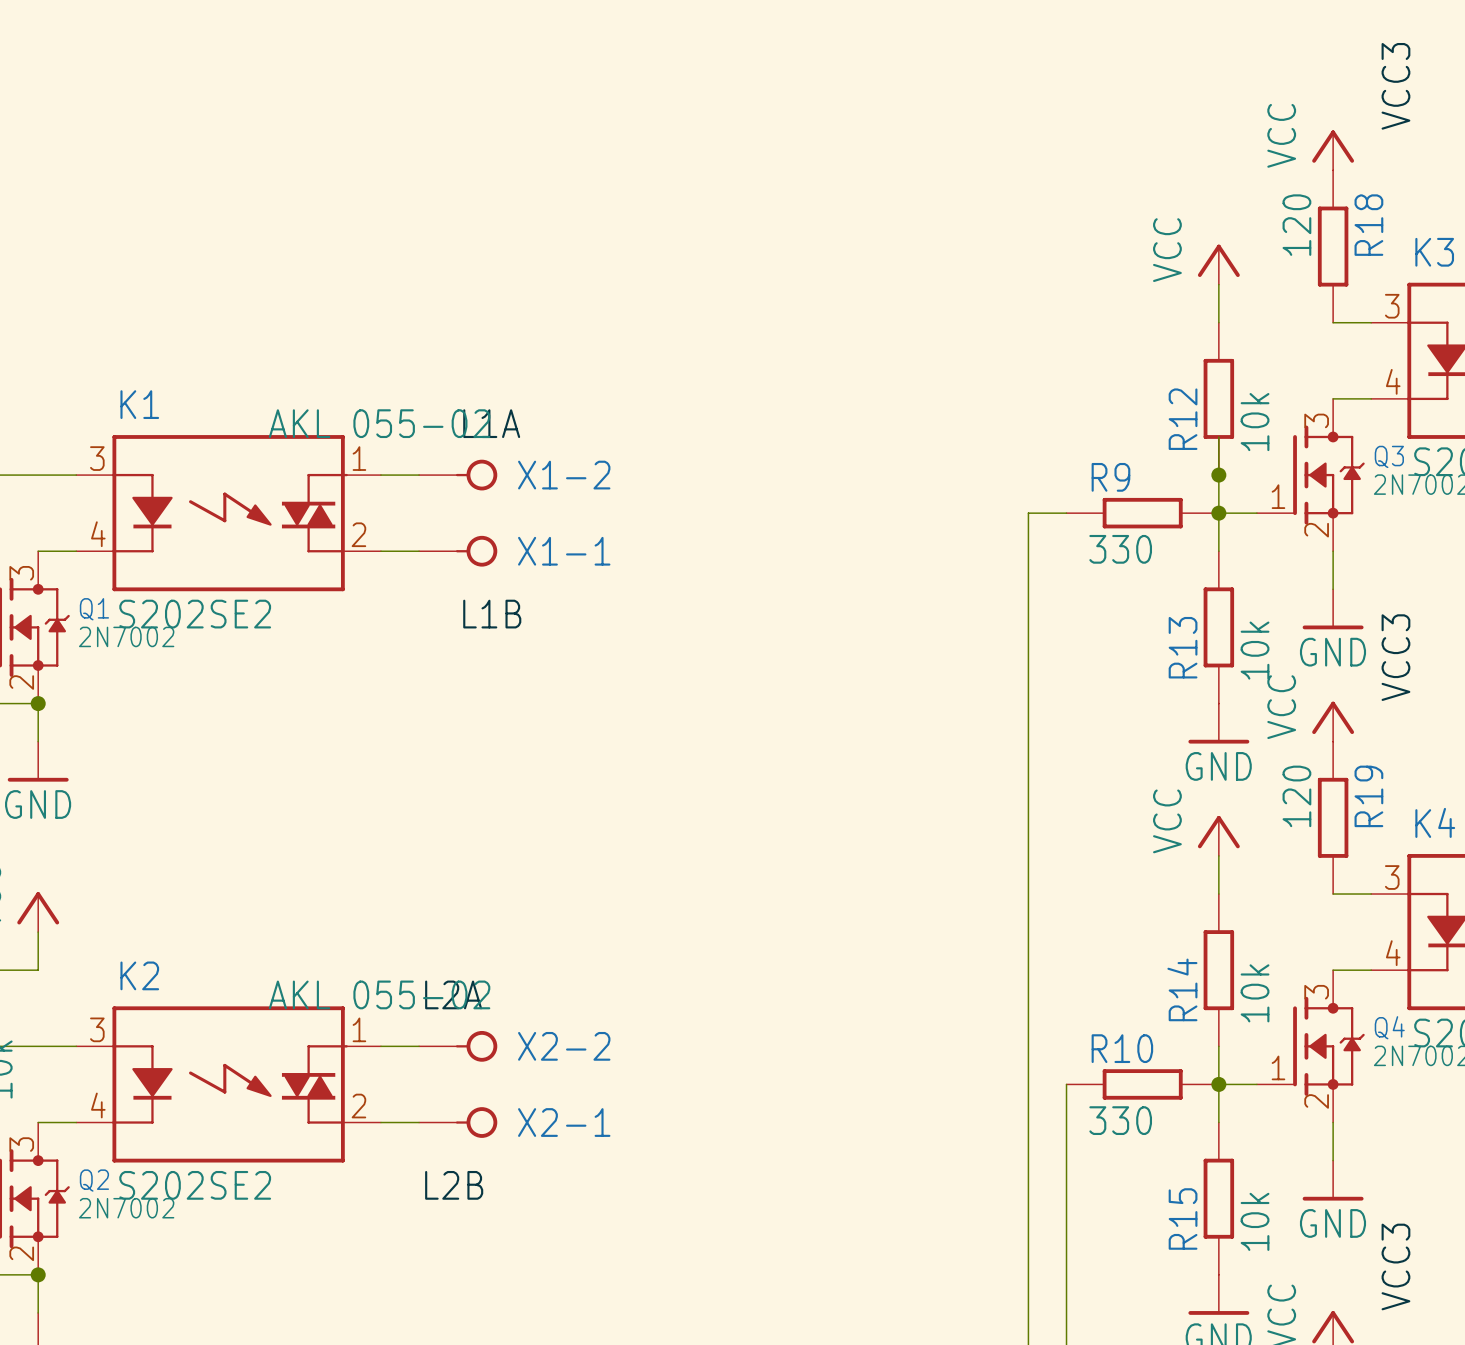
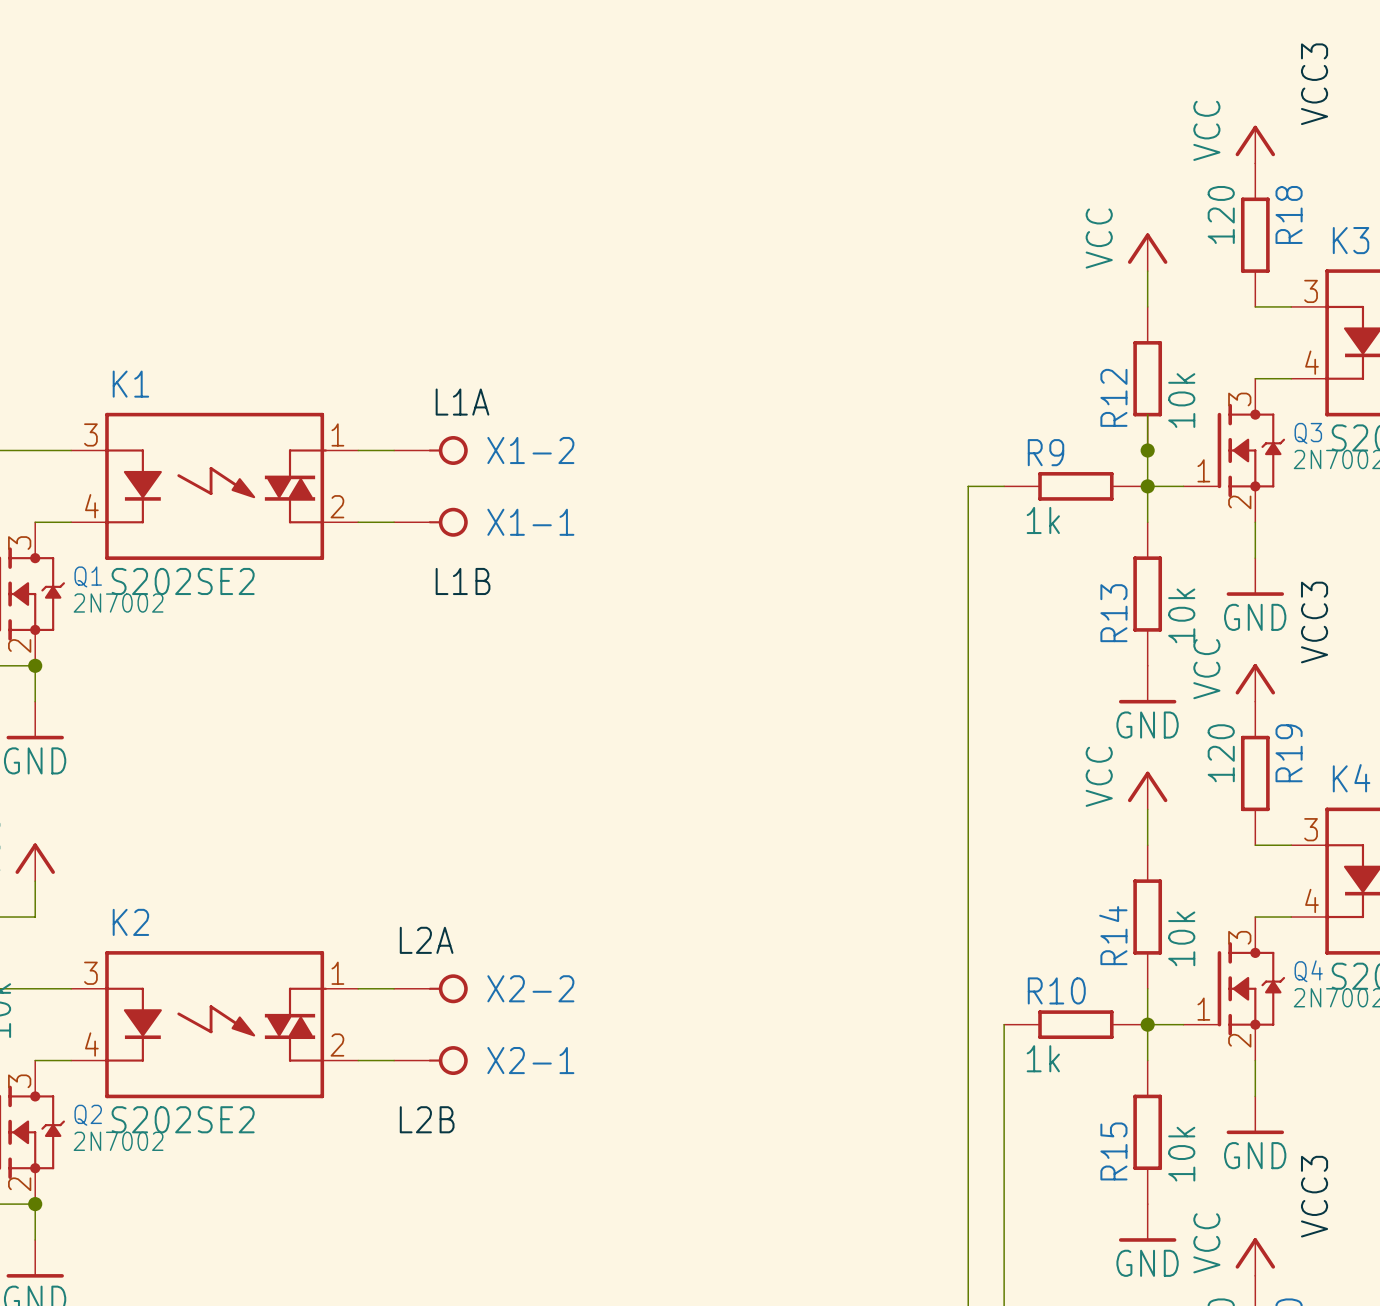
X1-2 value: AKL 055-02 (379, 423) -> none
R9 value: 330 (1120, 549) -> 1k (1043, 520)
X2-2 value: AKL 055-02 (379, 994) -> none
R10 value: 330 (1120, 1120) -> 1k (1043, 1058)

